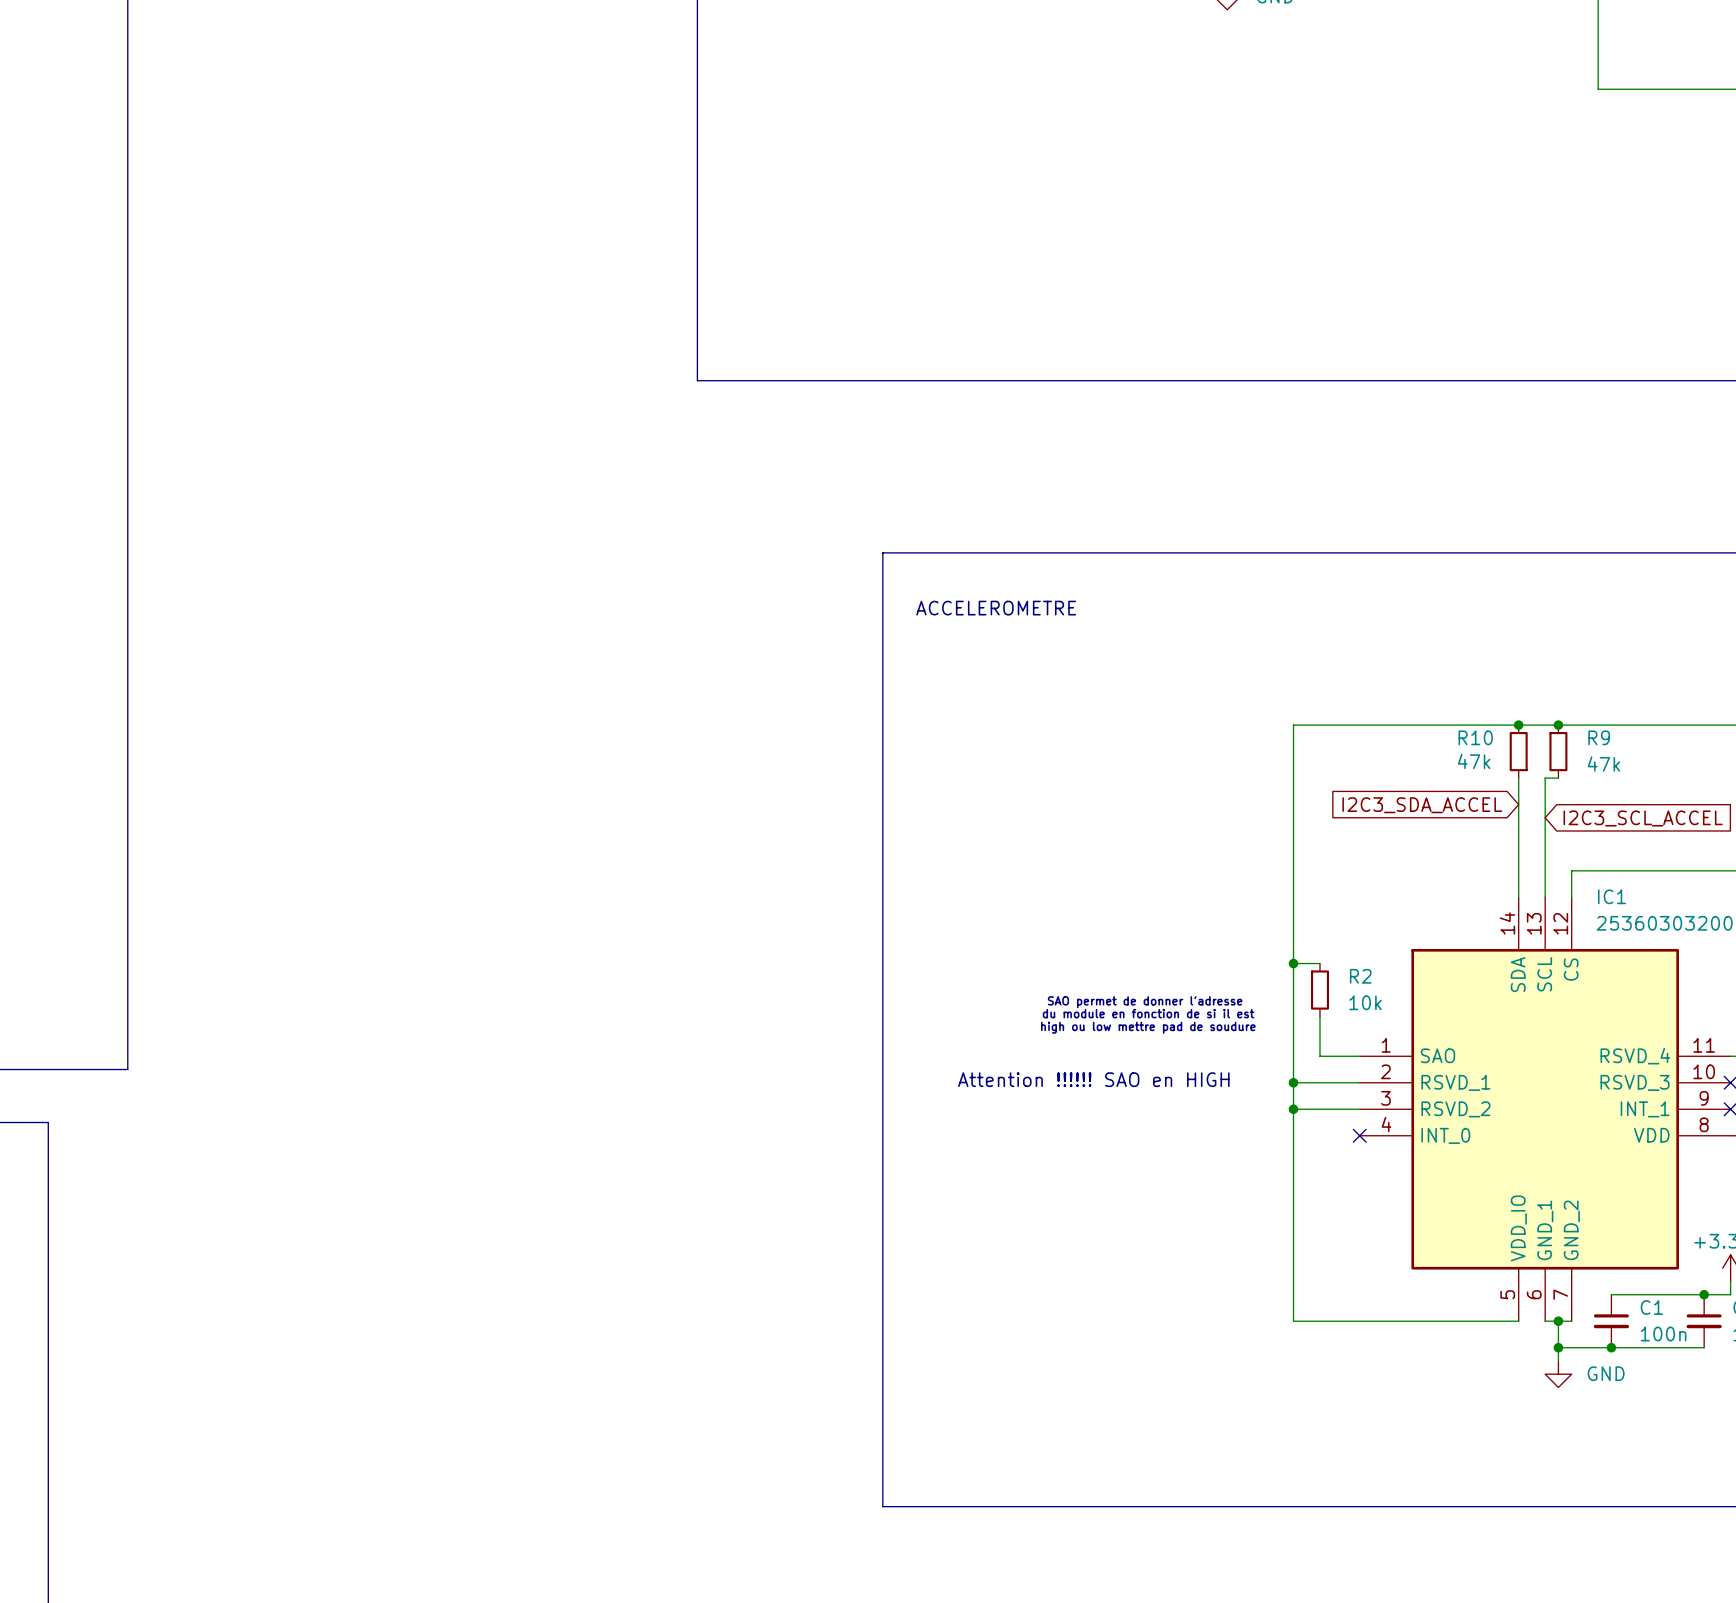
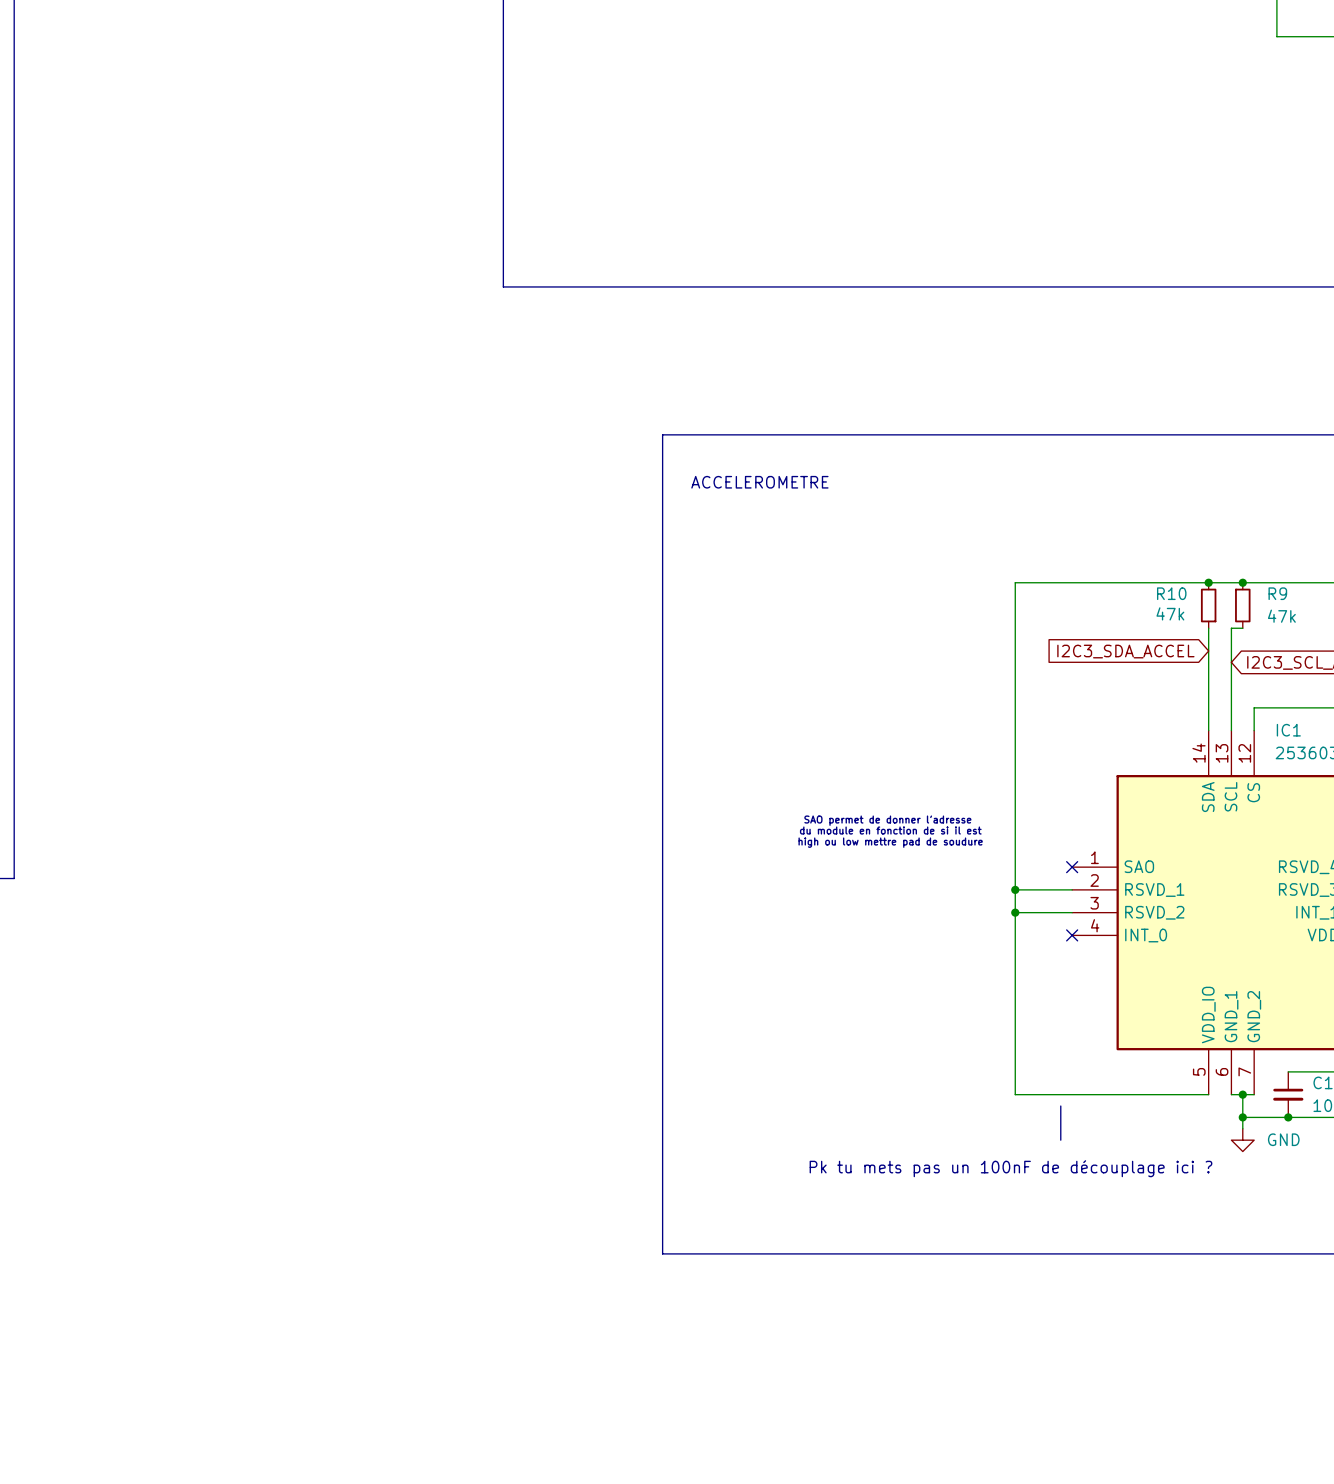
wire: (1293, 963) (1319, 963) -> none
junction: (1293, 963) -> none
R2: 10k (1319, 990) -> none
wire: (1319, 1016) (1319, 1056) (1359, 1056) -> none
no-connect mark: none -> (1072, 867)
text: Attention !!!!!! SAO en HIGH (1093, 1079) -> none
line: none -> (1060, 1106) (1060, 1140)
text: none -> Pk tu mets pas un 100nF de découplage ici ? (1010, 1168)

